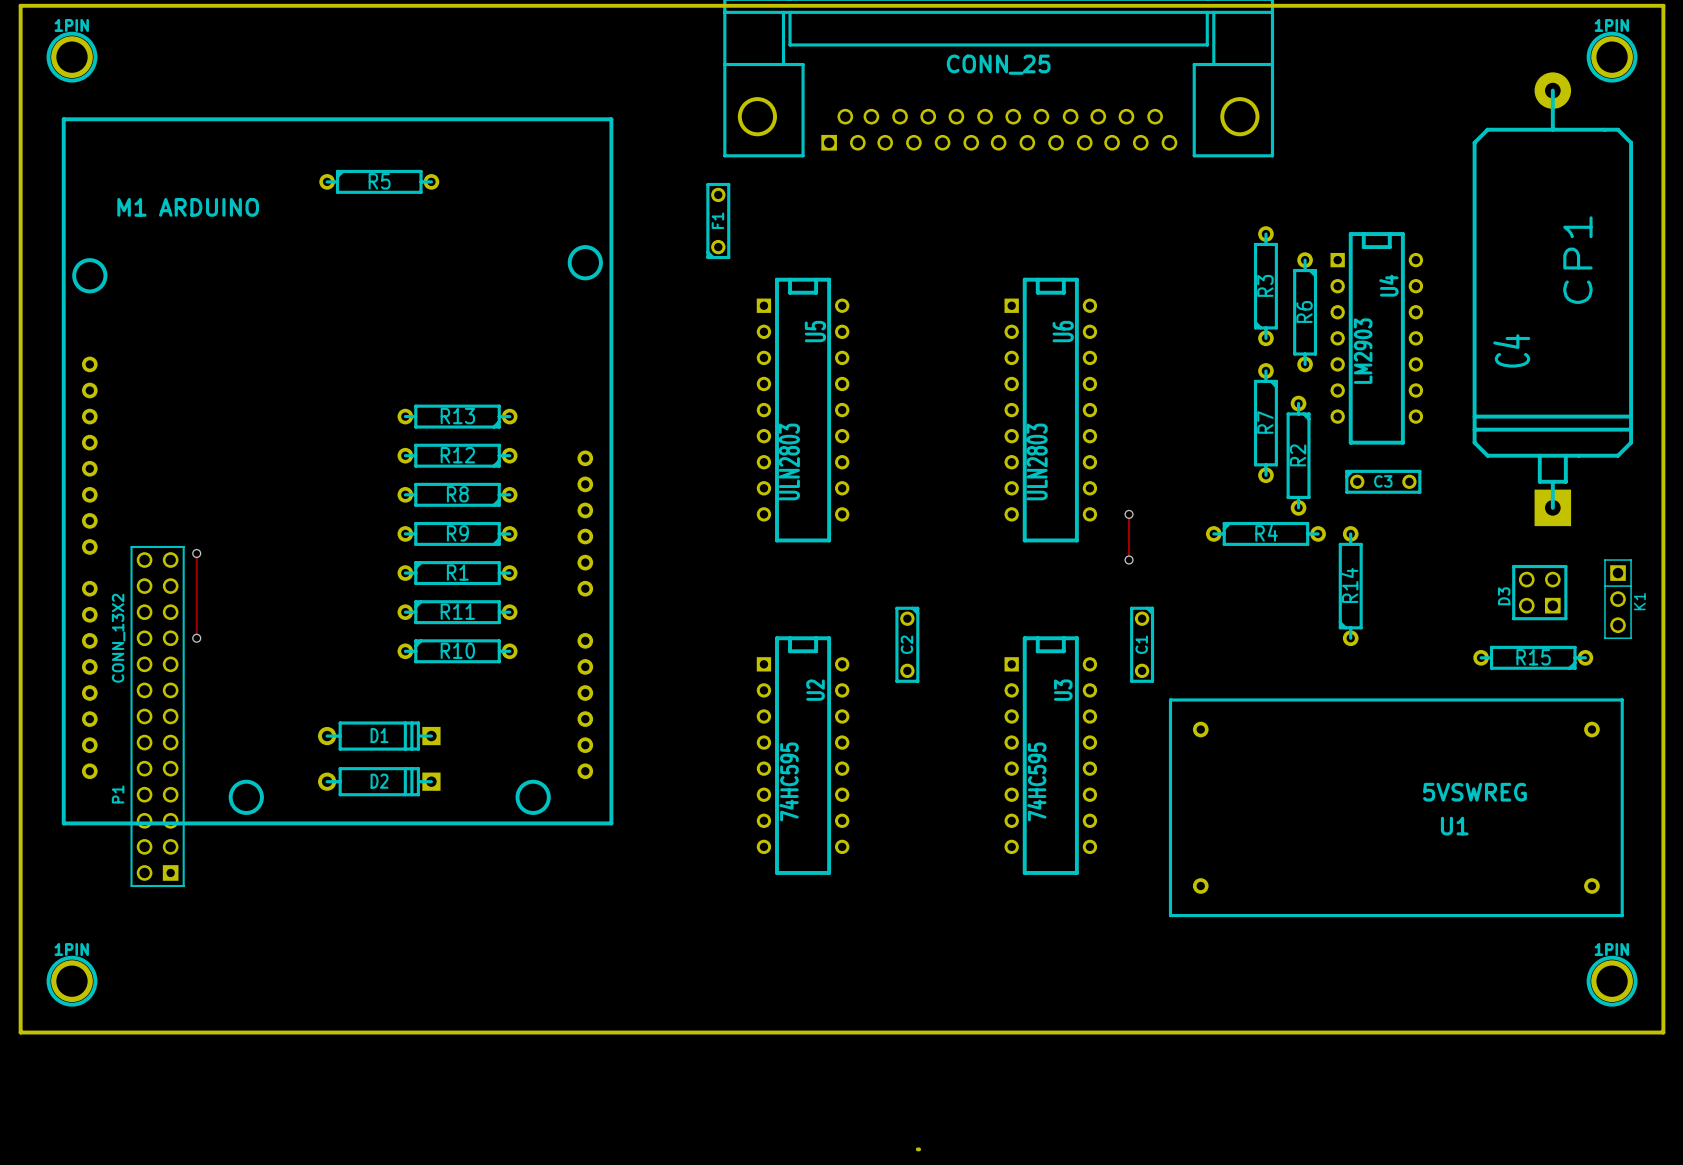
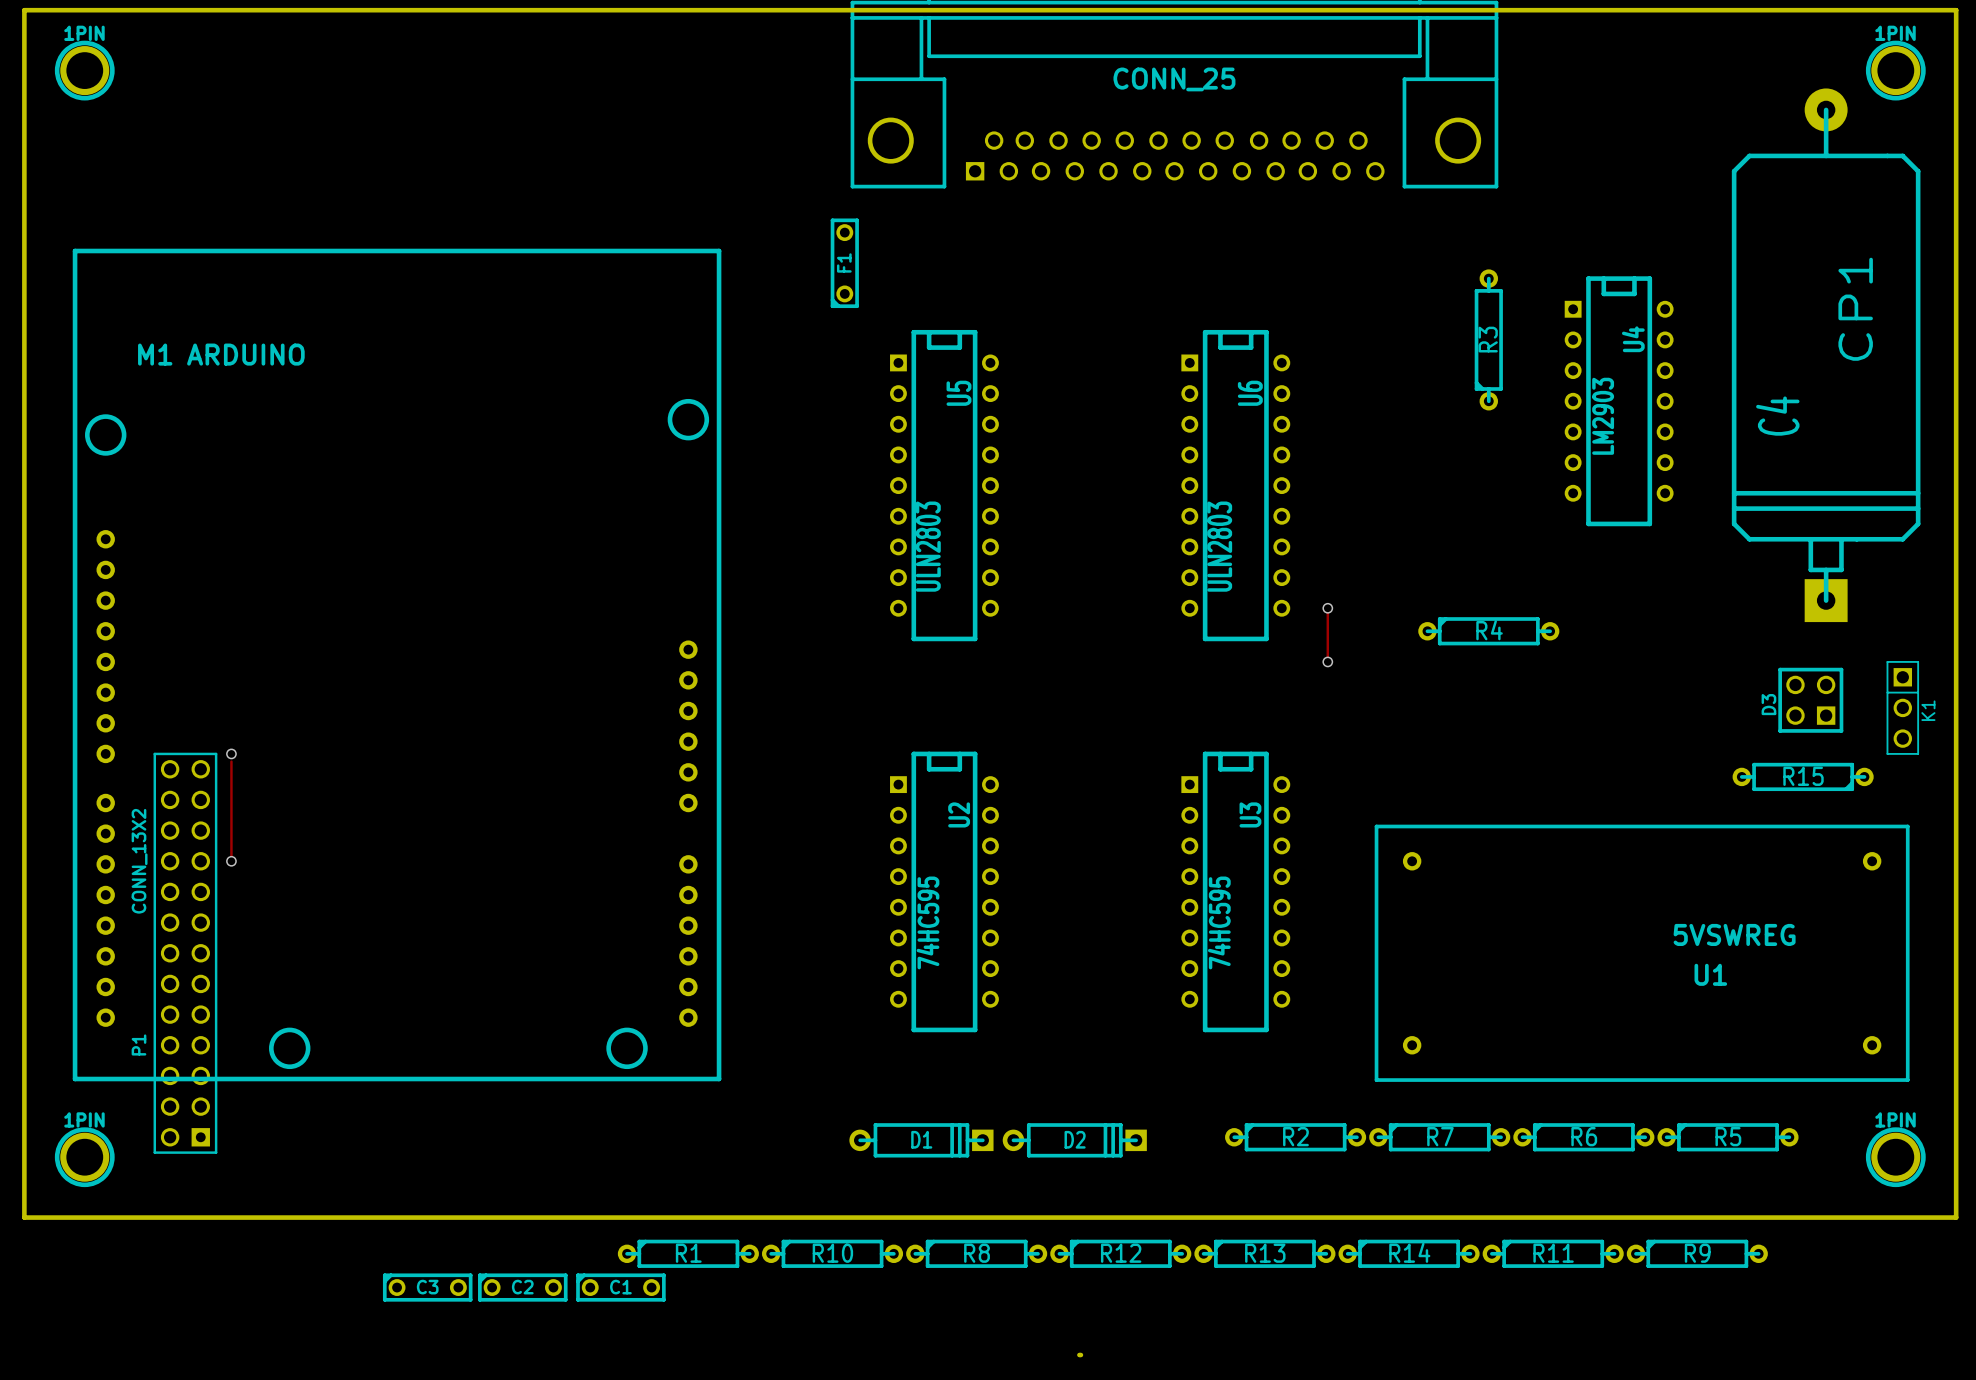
R5 position: (379, 181) -> (1728, 1137)
R6 rotation: 0° (1305, 312) -> 90° counterclockwise (1583, 1137)
R6 position: (1305, 312) -> (1583, 1137)
R13 rotation: 0° (457, 416) -> 180° (1264, 1253)
R13 position: (457, 416) -> (1264, 1253)
R7 rotation: 0° (1265, 423) -> 90° counterclockwise (1439, 1137)
R7 position: (1265, 423) -> (1439, 1137)
R12 rotation: 0° (457, 455) -> 180° (1120, 1253)
R12 position: (457, 455) -> (1120, 1253)
R2 rotation: 0° (1298, 455) -> 90° counterclockwise (1295, 1137)
R2 position: (1298, 455) -> (1295, 1137)
M1 position: (337, 471) -> (397, 665)
C3 position: (1383, 481) -> (427, 1287)
R8 rotation: 0° (457, 494) -> 180° (976, 1253)
R8 position: (457, 494) -> (976, 1253)
R9 rotation: 0° (457, 533) -> 180° (1697, 1253)
R9 position: (457, 533) -> (1697, 1253)
track: (196, 553) (196, 638) -> (231, 761) (231, 861)
via: (196, 553) -> none
R1 position: (457, 573) -> (688, 1253)
R14 rotation: 0° (1350, 586) -> 90° clockwise (1409, 1253)
R14 position: (1350, 586) -> (1409, 1253)
R11 position: (457, 612) -> (1553, 1253)
C2 rotation: 0° (907, 644) -> 90° counterclockwise (522, 1287)
C2 position: (907, 644) -> (522, 1287)
C1 rotation: 0° (1142, 644) -> 90° counterclockwise (620, 1287)
C1 position: (1142, 644) -> (620, 1287)
R10 position: (457, 651) -> (832, 1253)
P1 position: (157, 716) -> (185, 953)
via: none -> (231, 861)
D1 position: (379, 736) -> (921, 1140)
D2 position: (379, 781) -> (1074, 1140)

